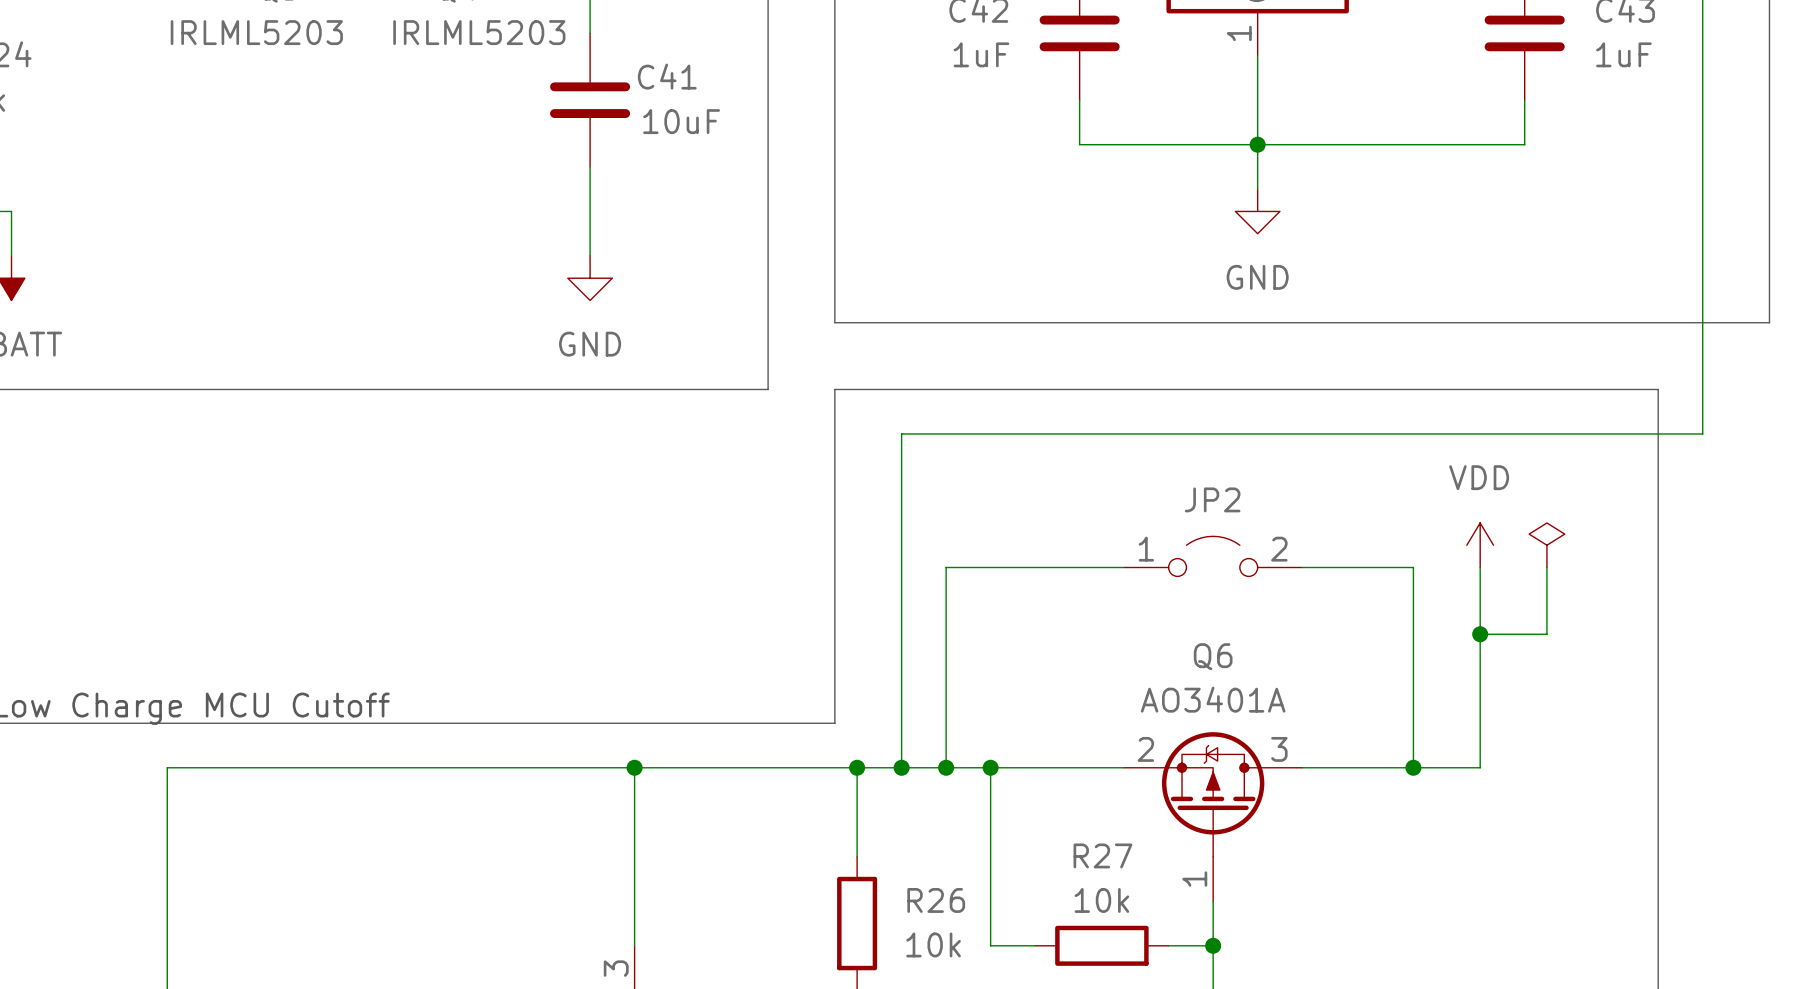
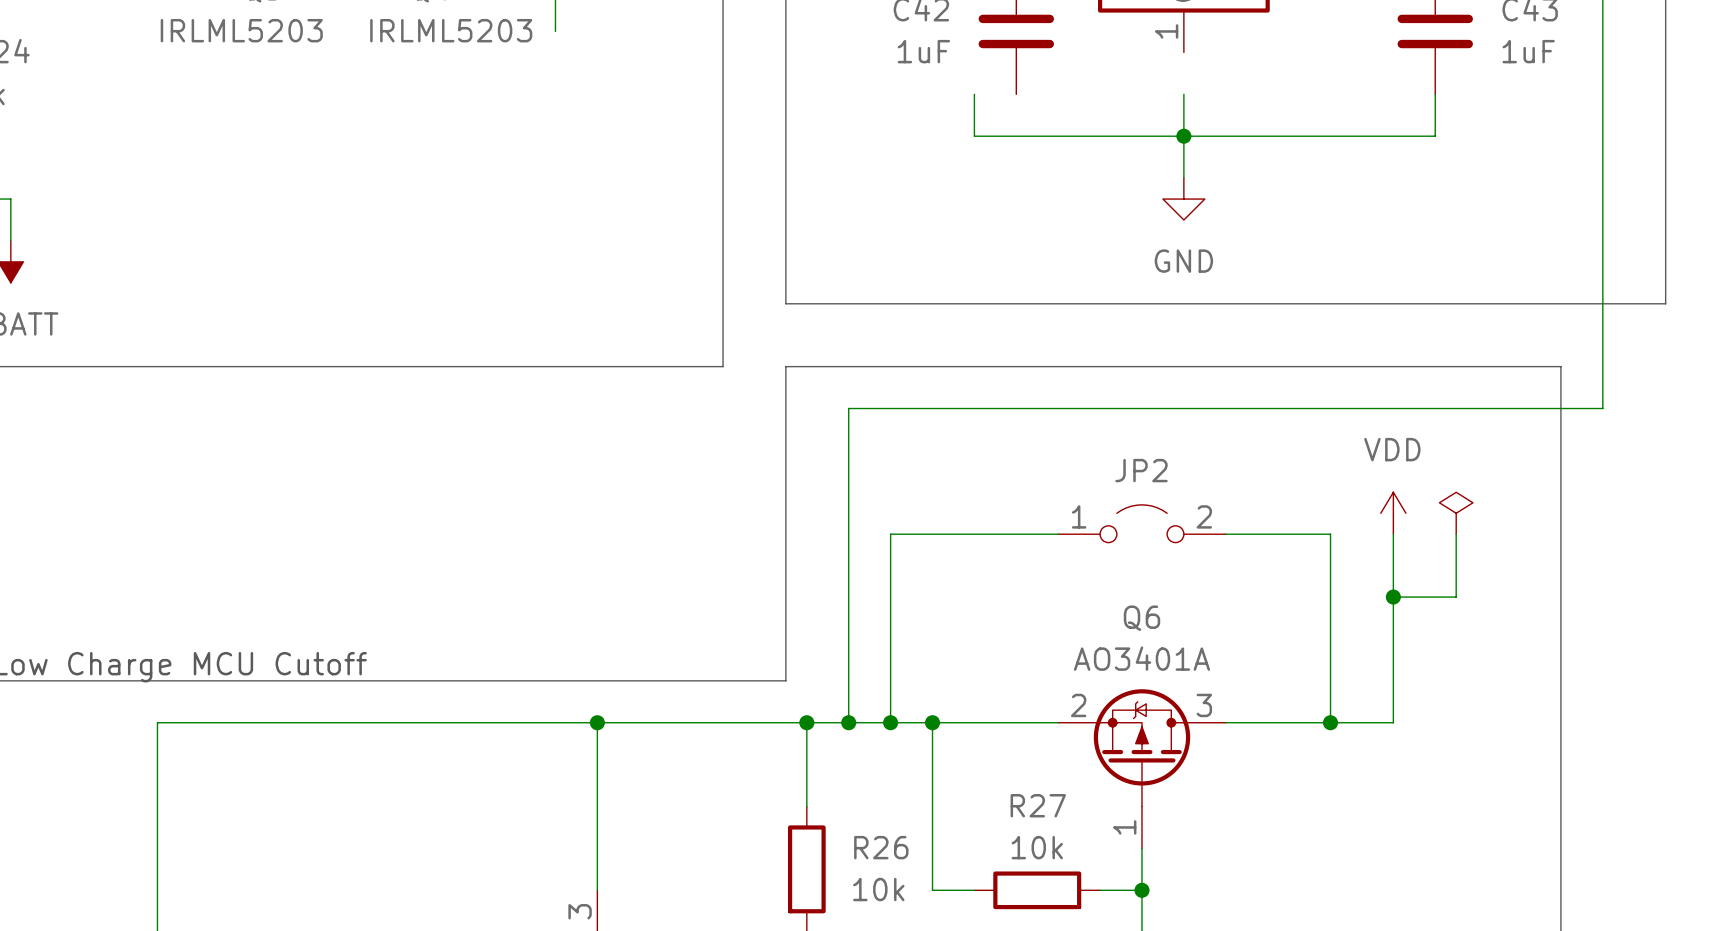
wire: (1257, 55) (1257, 100) -> none
C41: 10uF (590, 100) -> none
wire: (1079, 100) (1079, 144) -> (974, 94) (974, 136) (1016, 136)
wire: (590, 166) (590, 255) -> none
power symbol: GND (590, 278) -> none

